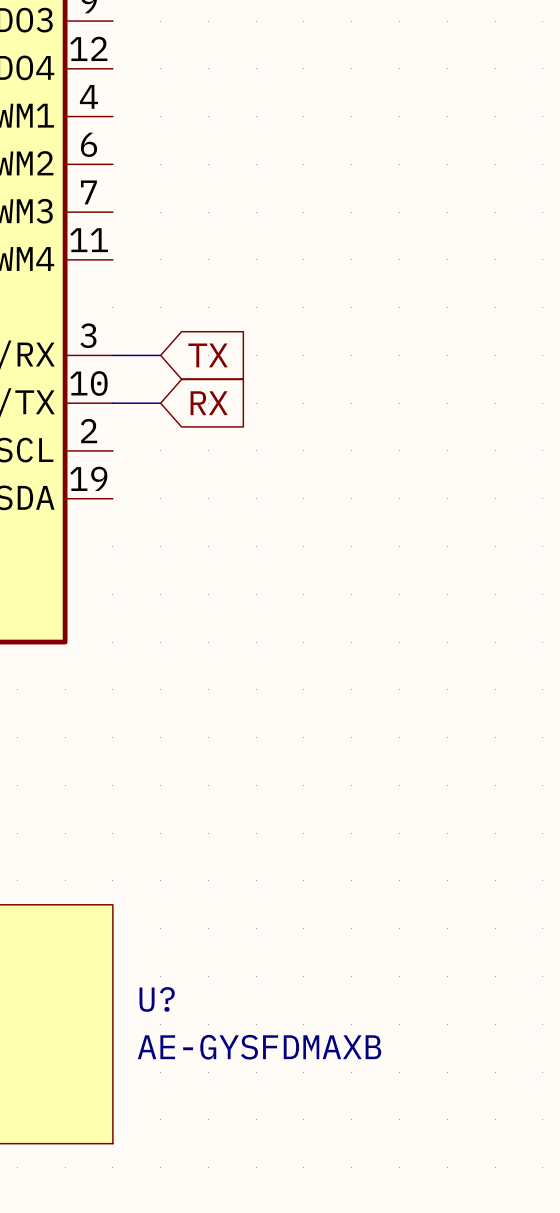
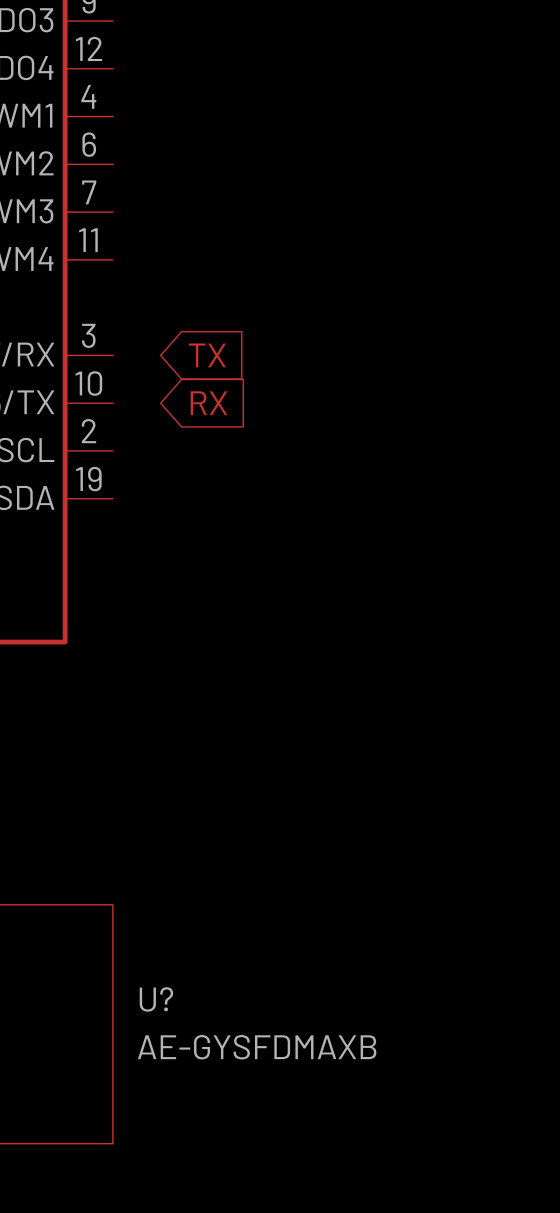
wire: (112, 355) (160, 355) -> none
wire: (112, 403) (160, 403) -> none

